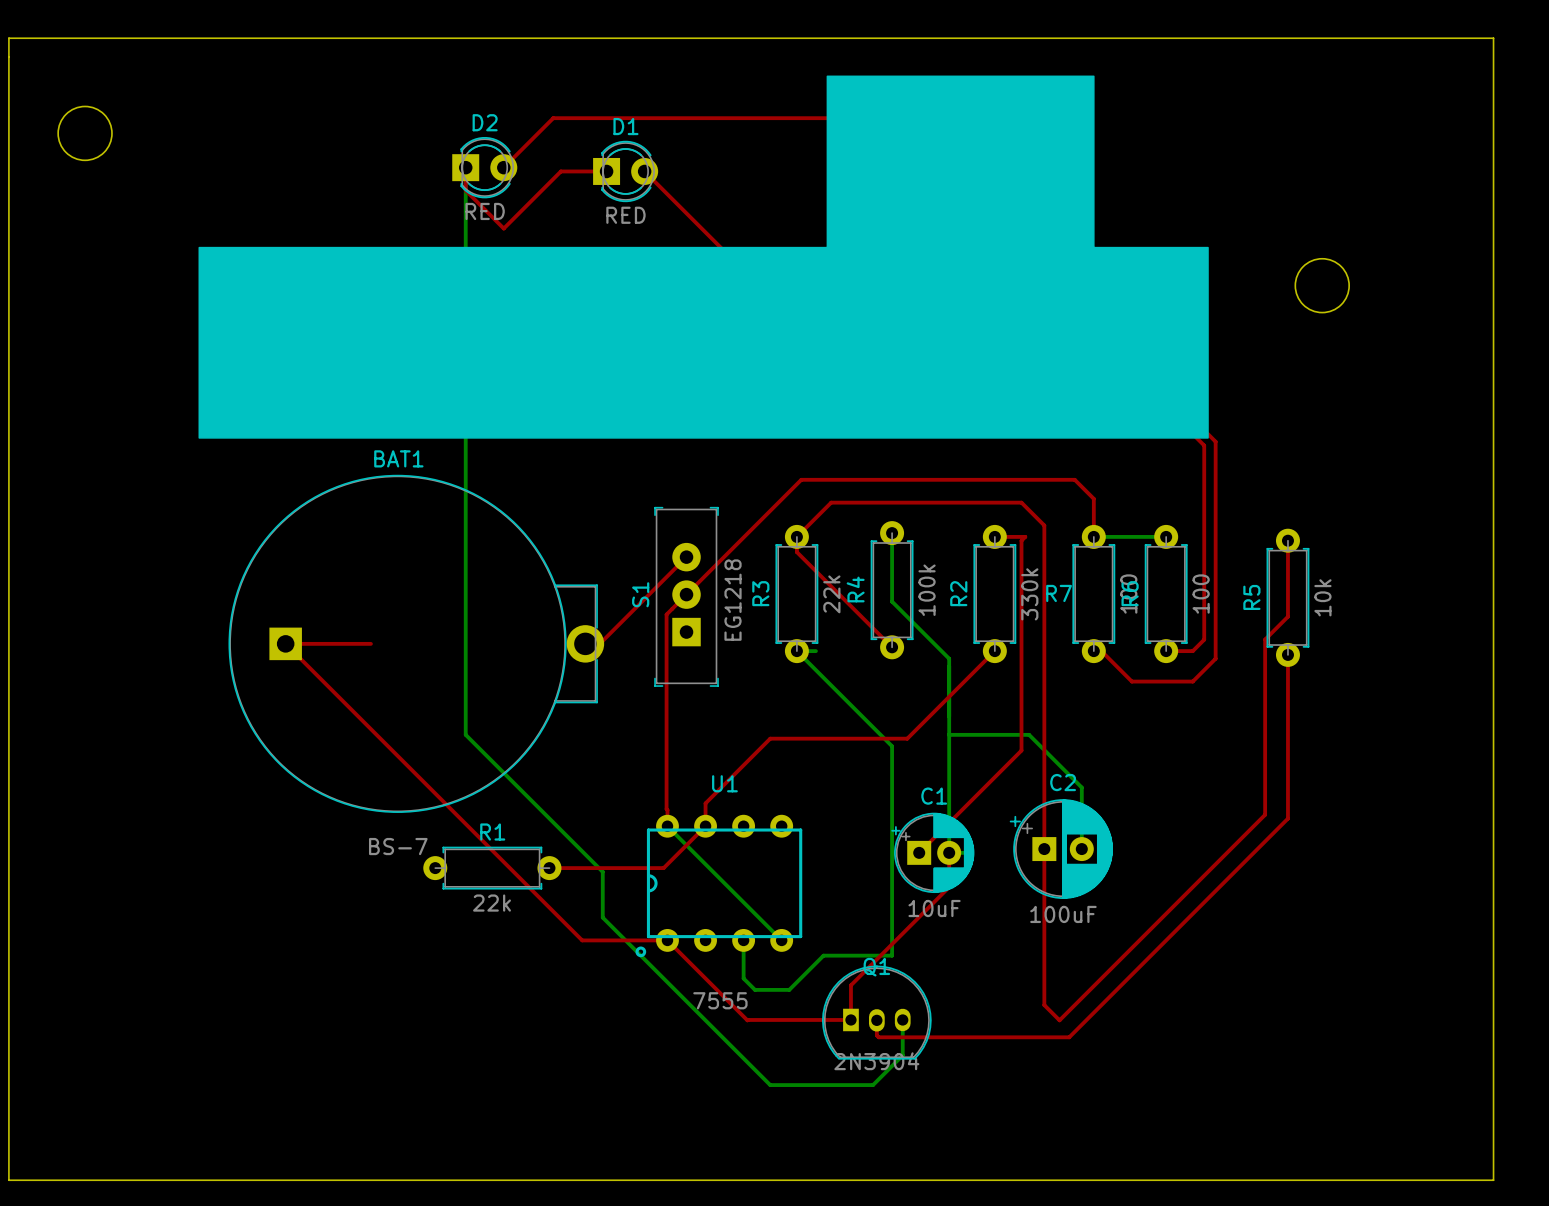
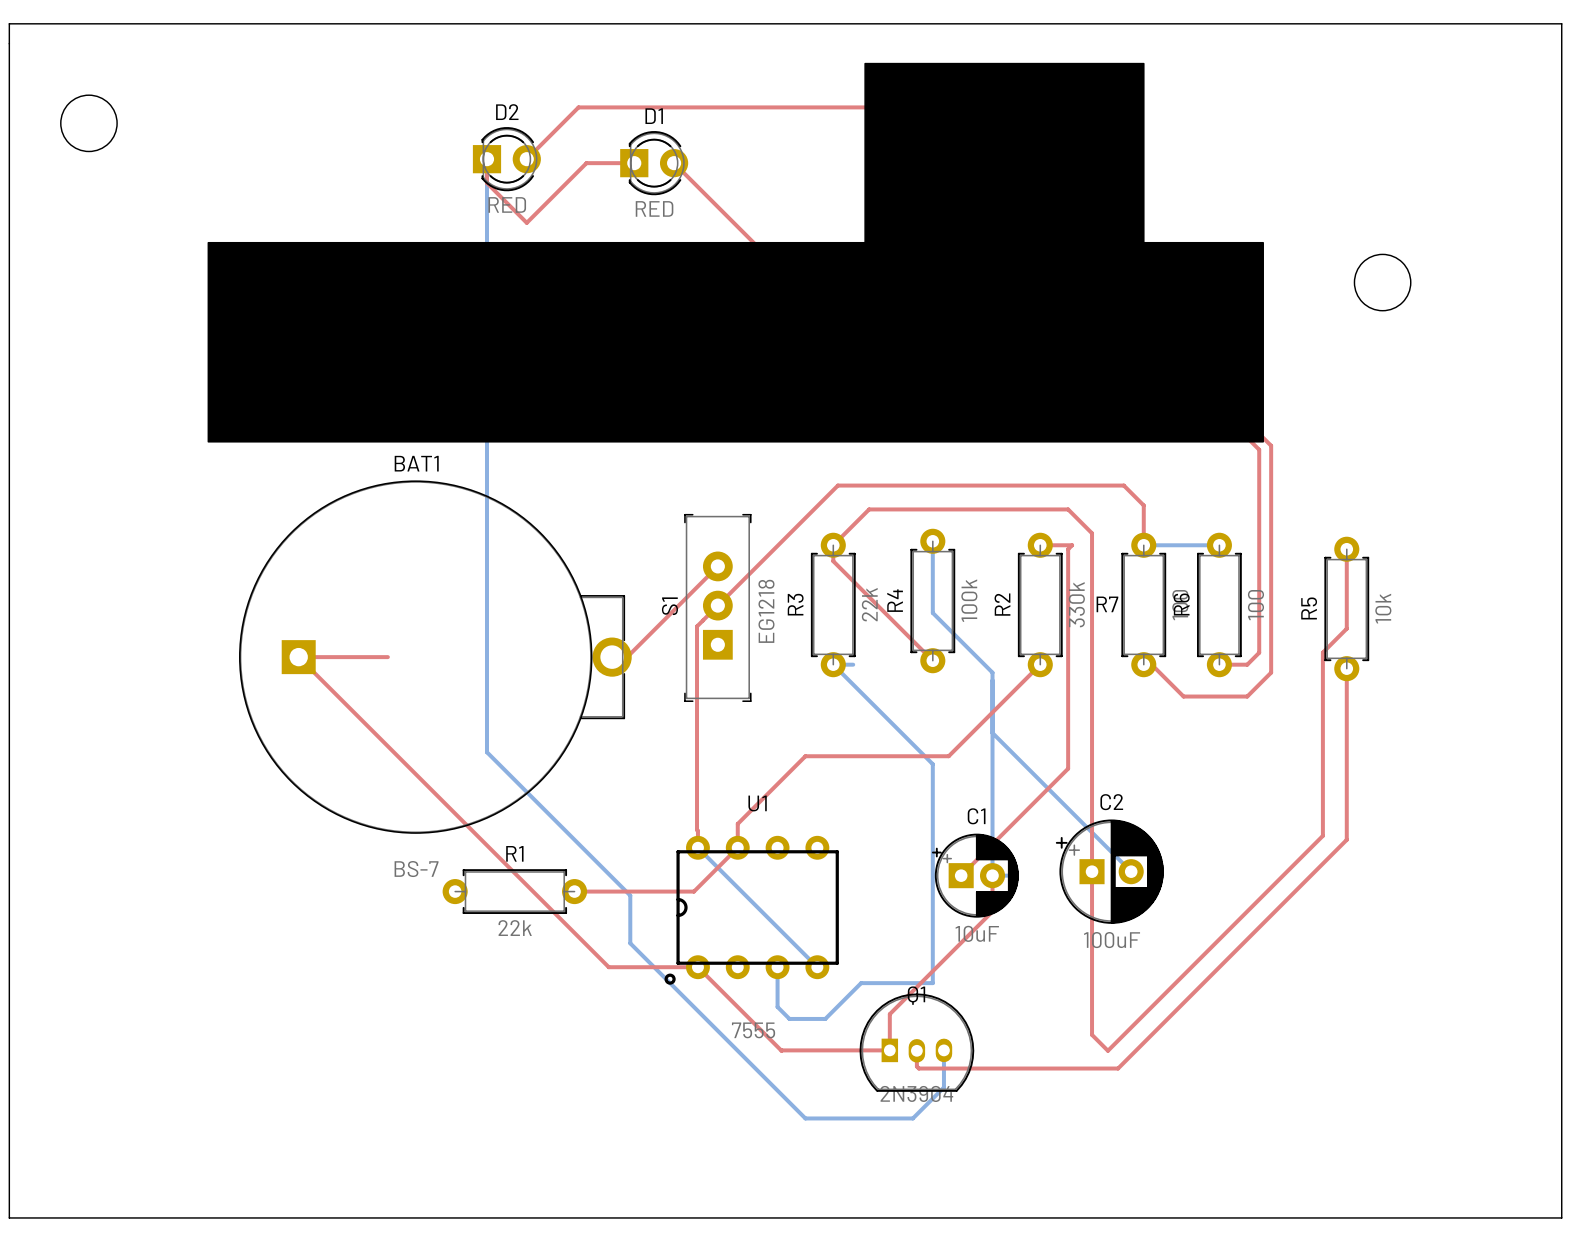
bottom track: (949, 734) (1029, 734) (1081, 787) (1081, 849) -> (992, 732) (1131, 871)

